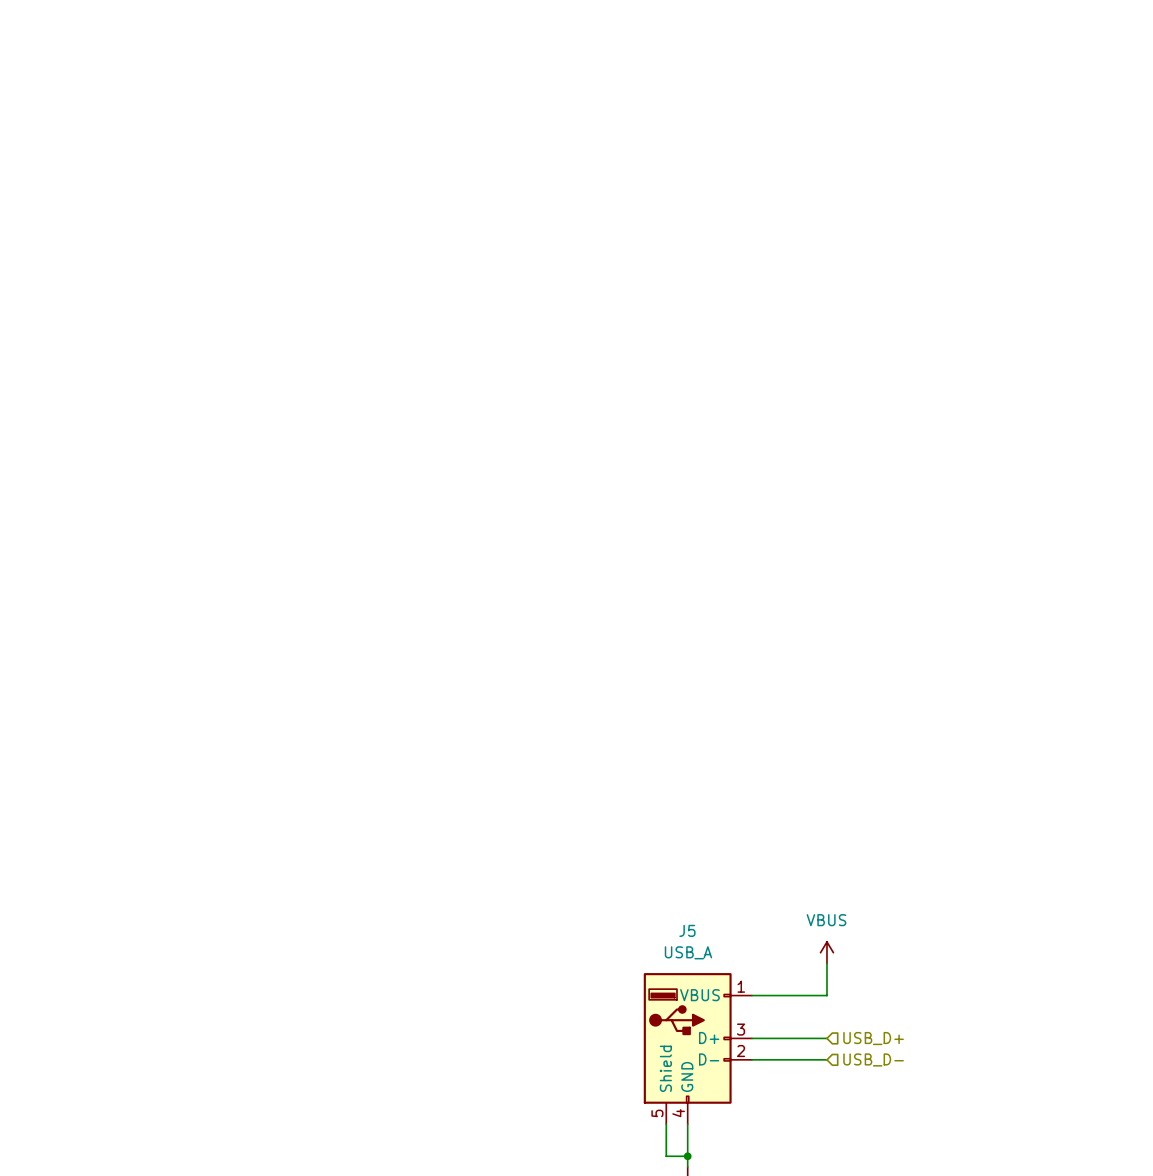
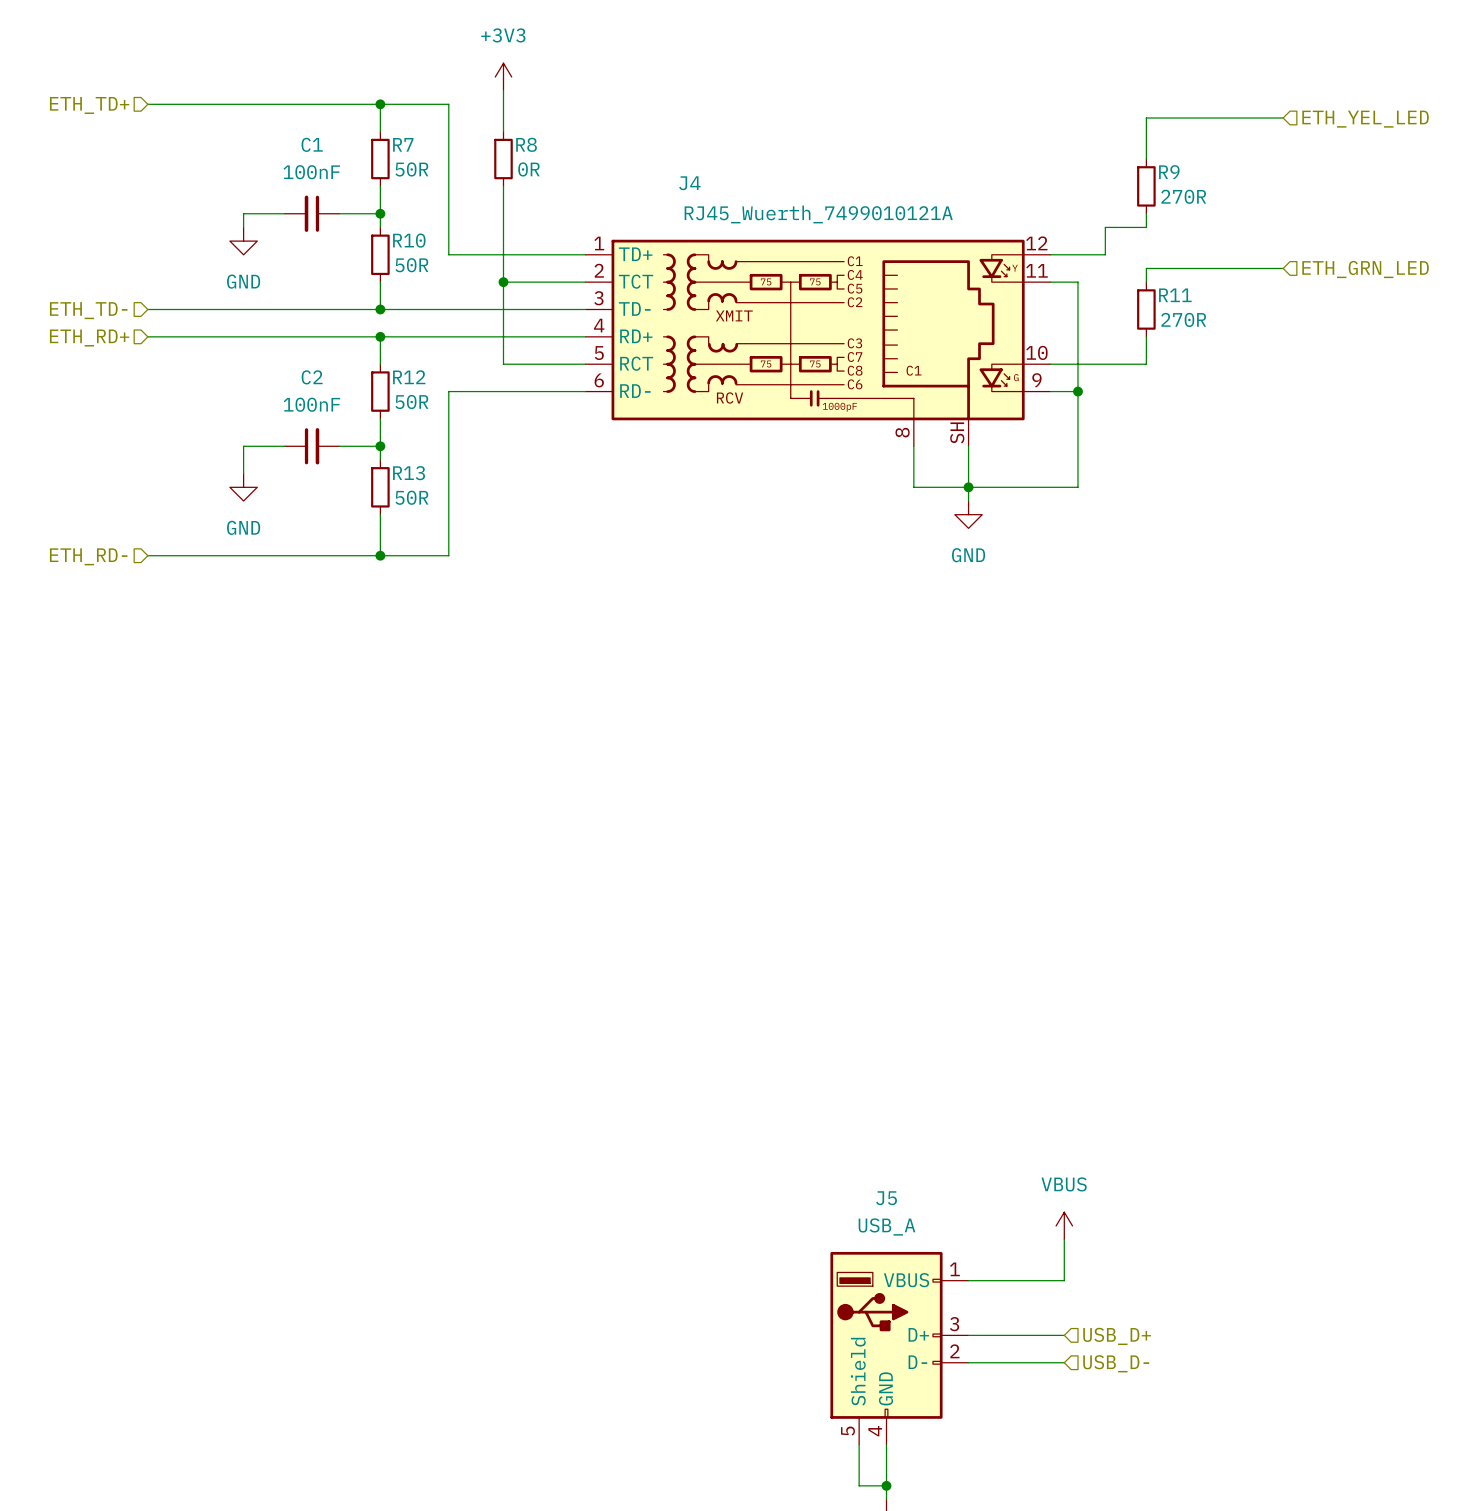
power symbol: none -> +3V3 (503, 76)
wire: none -> (503, 90) (503, 131)
hierarchical label: none -> ETH_TD+ (89, 105)
wire: none -> (147, 104) (448, 104) (448, 254) (585, 254)
wire: none -> (380, 104) (380, 131)
junction: none -> (380, 104)
wire: none -> (1283, 118) (1146, 118) (1146, 159)
hierarchical label: none -> ETH_YEL_LED (1365, 119)
R7: none -> 50R (380, 159)
R8: none -> 0R (503, 159)
wire: none -> (380, 186) (380, 227)
wire: none -> (503, 186) (503, 364) (585, 364)
R9: none -> 270R (1146, 186)
wire: none -> (284, 213) (243, 213) (243, 227)
C1: none -> 100nF (311, 213)
wire: none -> (339, 213) (380, 213)
junction: none -> (380, 213)
wire: none -> (1146, 213) (1146, 227) (1105, 227) (1105, 254) (1050, 254)
power symbol: none -> GND (243, 241)
R10: none -> 50R (380, 254)
wire: none -> (1283, 268) (1146, 268) (1146, 282)
hierarchical label: none -> ETH_GRN_LED (1365, 269)
wire: none -> (380, 282) (380, 309)
wire: none -> (503, 282) (585, 282)
junction: none -> (503, 282)
wire: none -> (1050, 282) (1077, 282) (1077, 487) (913, 487) (913, 446)
hierarchical label: none -> ETH_TD- (88, 310)
wire: none -> (147, 309) (585, 309)
junction: none -> (380, 309)
R11: none -> 270R (1146, 309)
hierarchical label: none -> ETH_RD+ (89, 338)
wire: none -> (147, 336) (585, 336)
wire: none -> (380, 336) (380, 364)
junction: none -> (380, 336)
wire: none -> (1146, 336) (1146, 364) (1050, 364)
J4: none -> RJ45_Wuerth_7499010121A (818, 343)
R12: none -> 50R (380, 391)
wire: none -> (585, 391) (448, 391) (448, 555) (147, 555)
wire: none -> (1050, 391) (1077, 391)
junction: none -> (1077, 391)
wire: none -> (380, 418) (380, 459)
wire: none -> (284, 446) (243, 446) (243, 473)
C2: none -> 100nF (311, 446)
wire: none -> (339, 446) (380, 446)
junction: none -> (380, 446)
wire: none -> (968, 446) (968, 500)
power symbol: none -> GND (243, 487)
R13: none -> 50R (380, 487)
junction: none -> (968, 487)
wire: none -> (380, 514) (380, 555)
power symbol: none -> GND (968, 514)
hierarchical label: none -> ETH_RD- (88, 556)
junction: none -> (380, 555)

